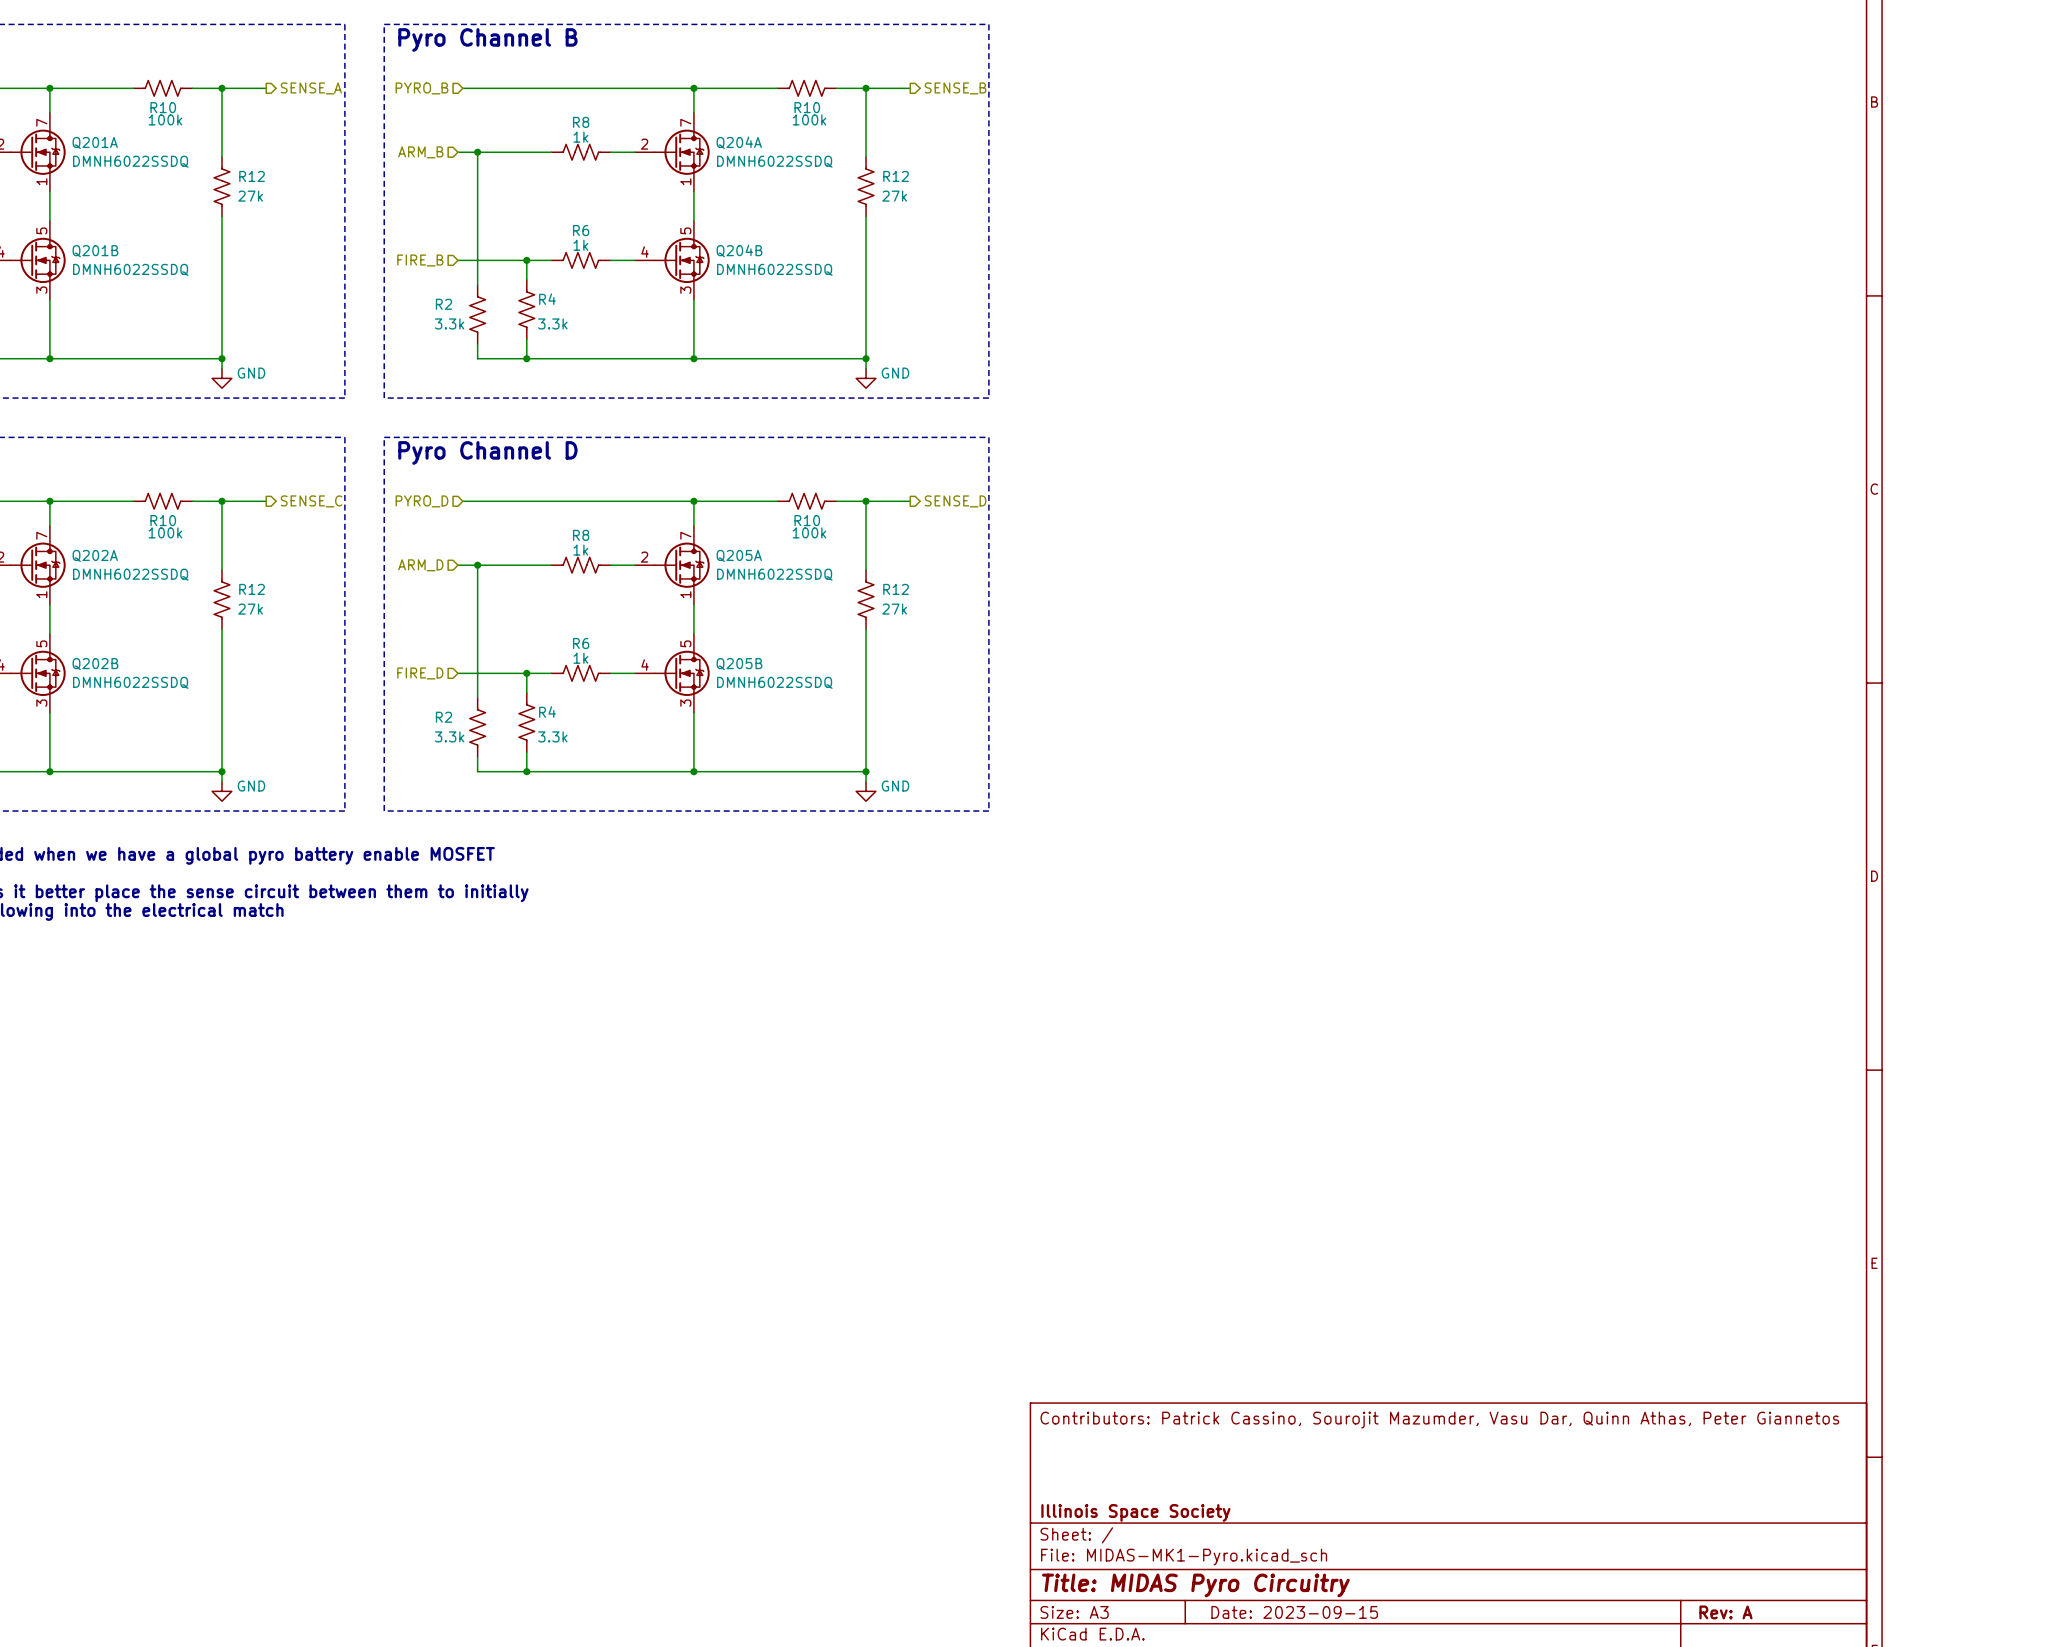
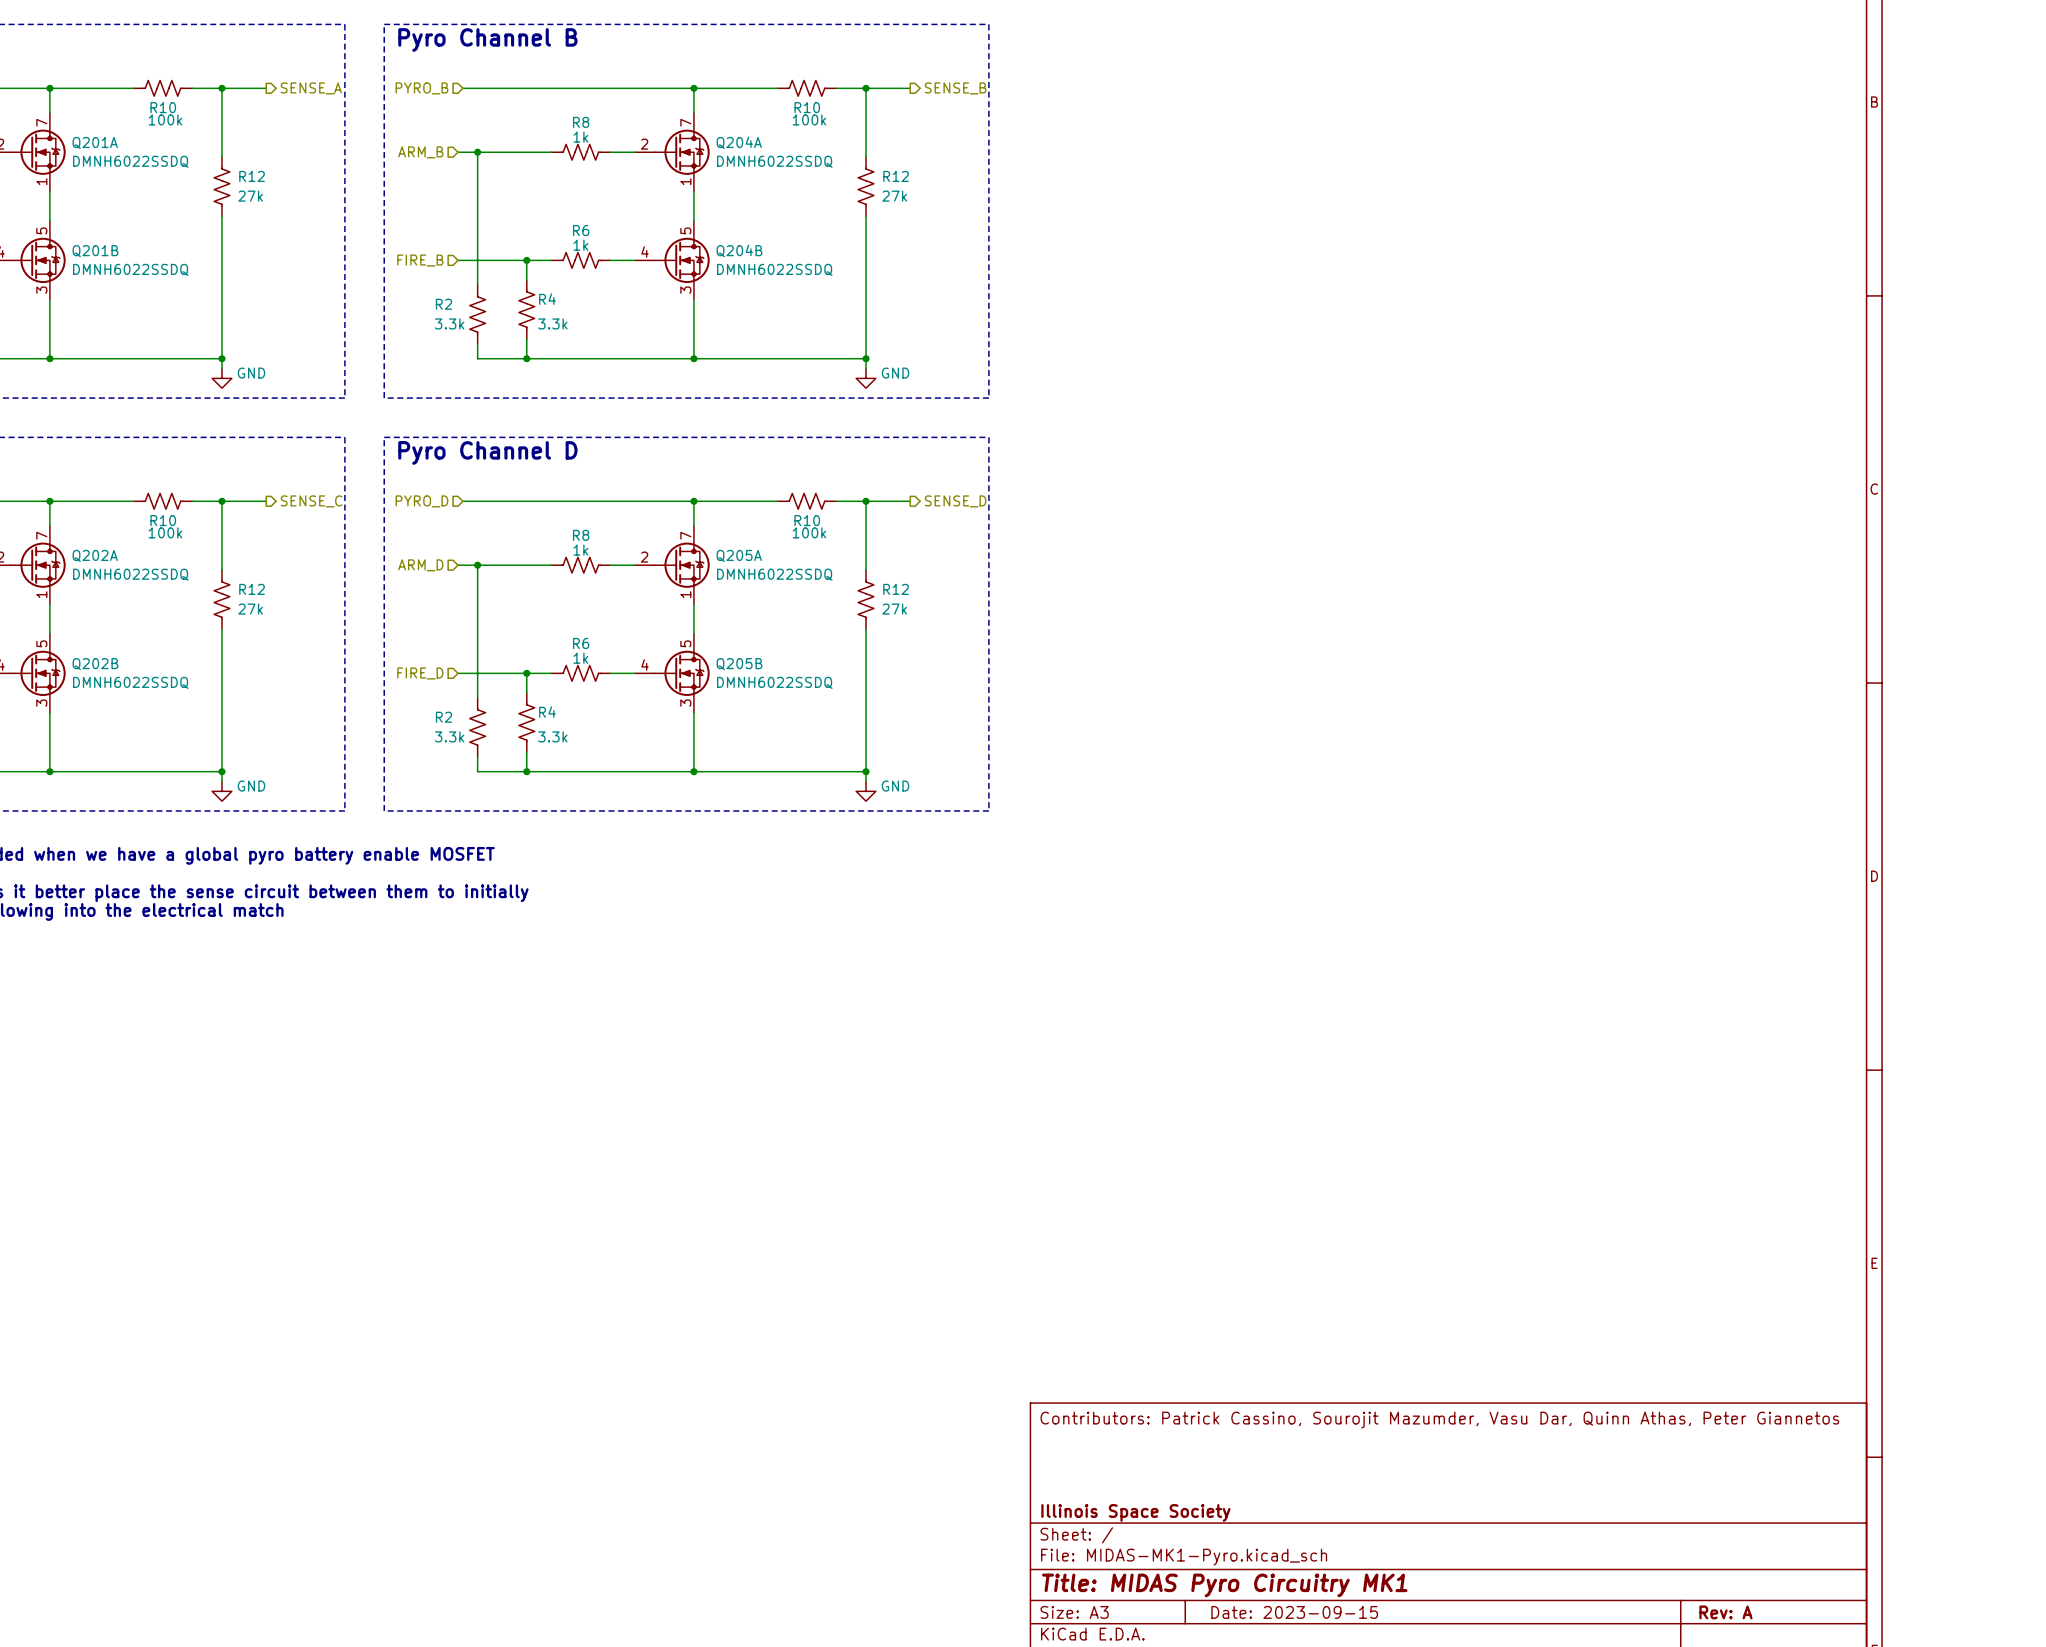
title block: Title: MIDAS Pyro Circuitry (1195, 1585) -> Title: MIDAS Pyro Circuitry MK1 (1224, 1585)

